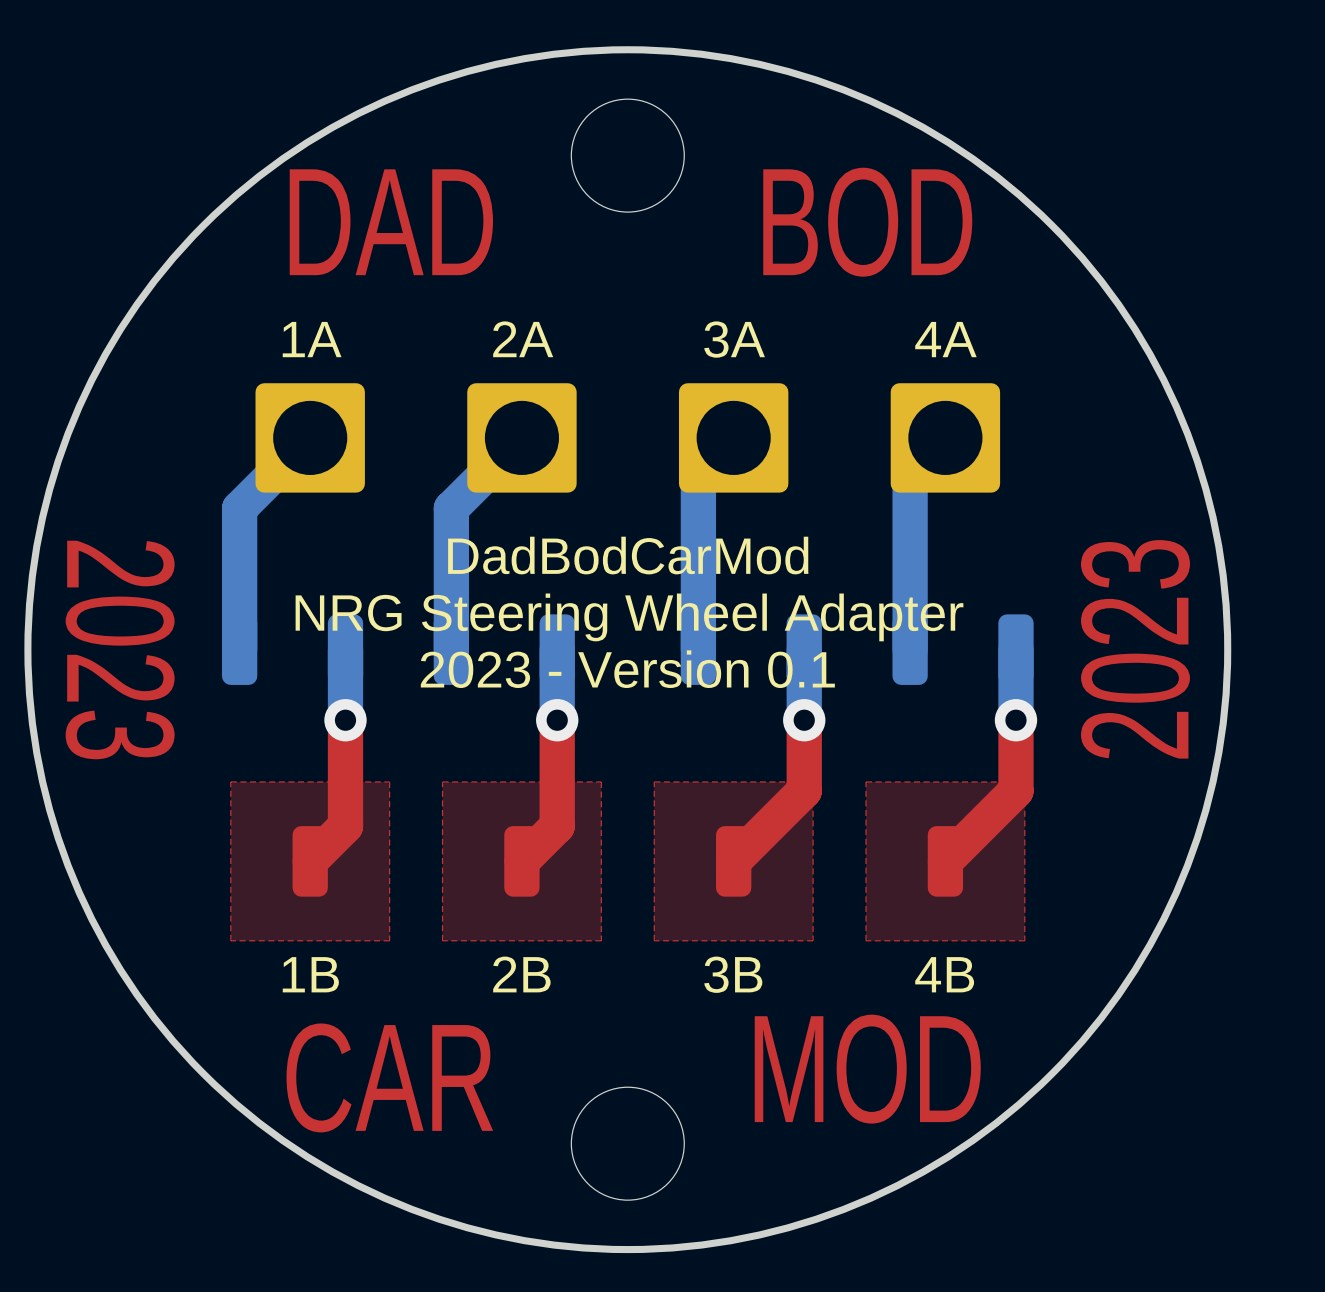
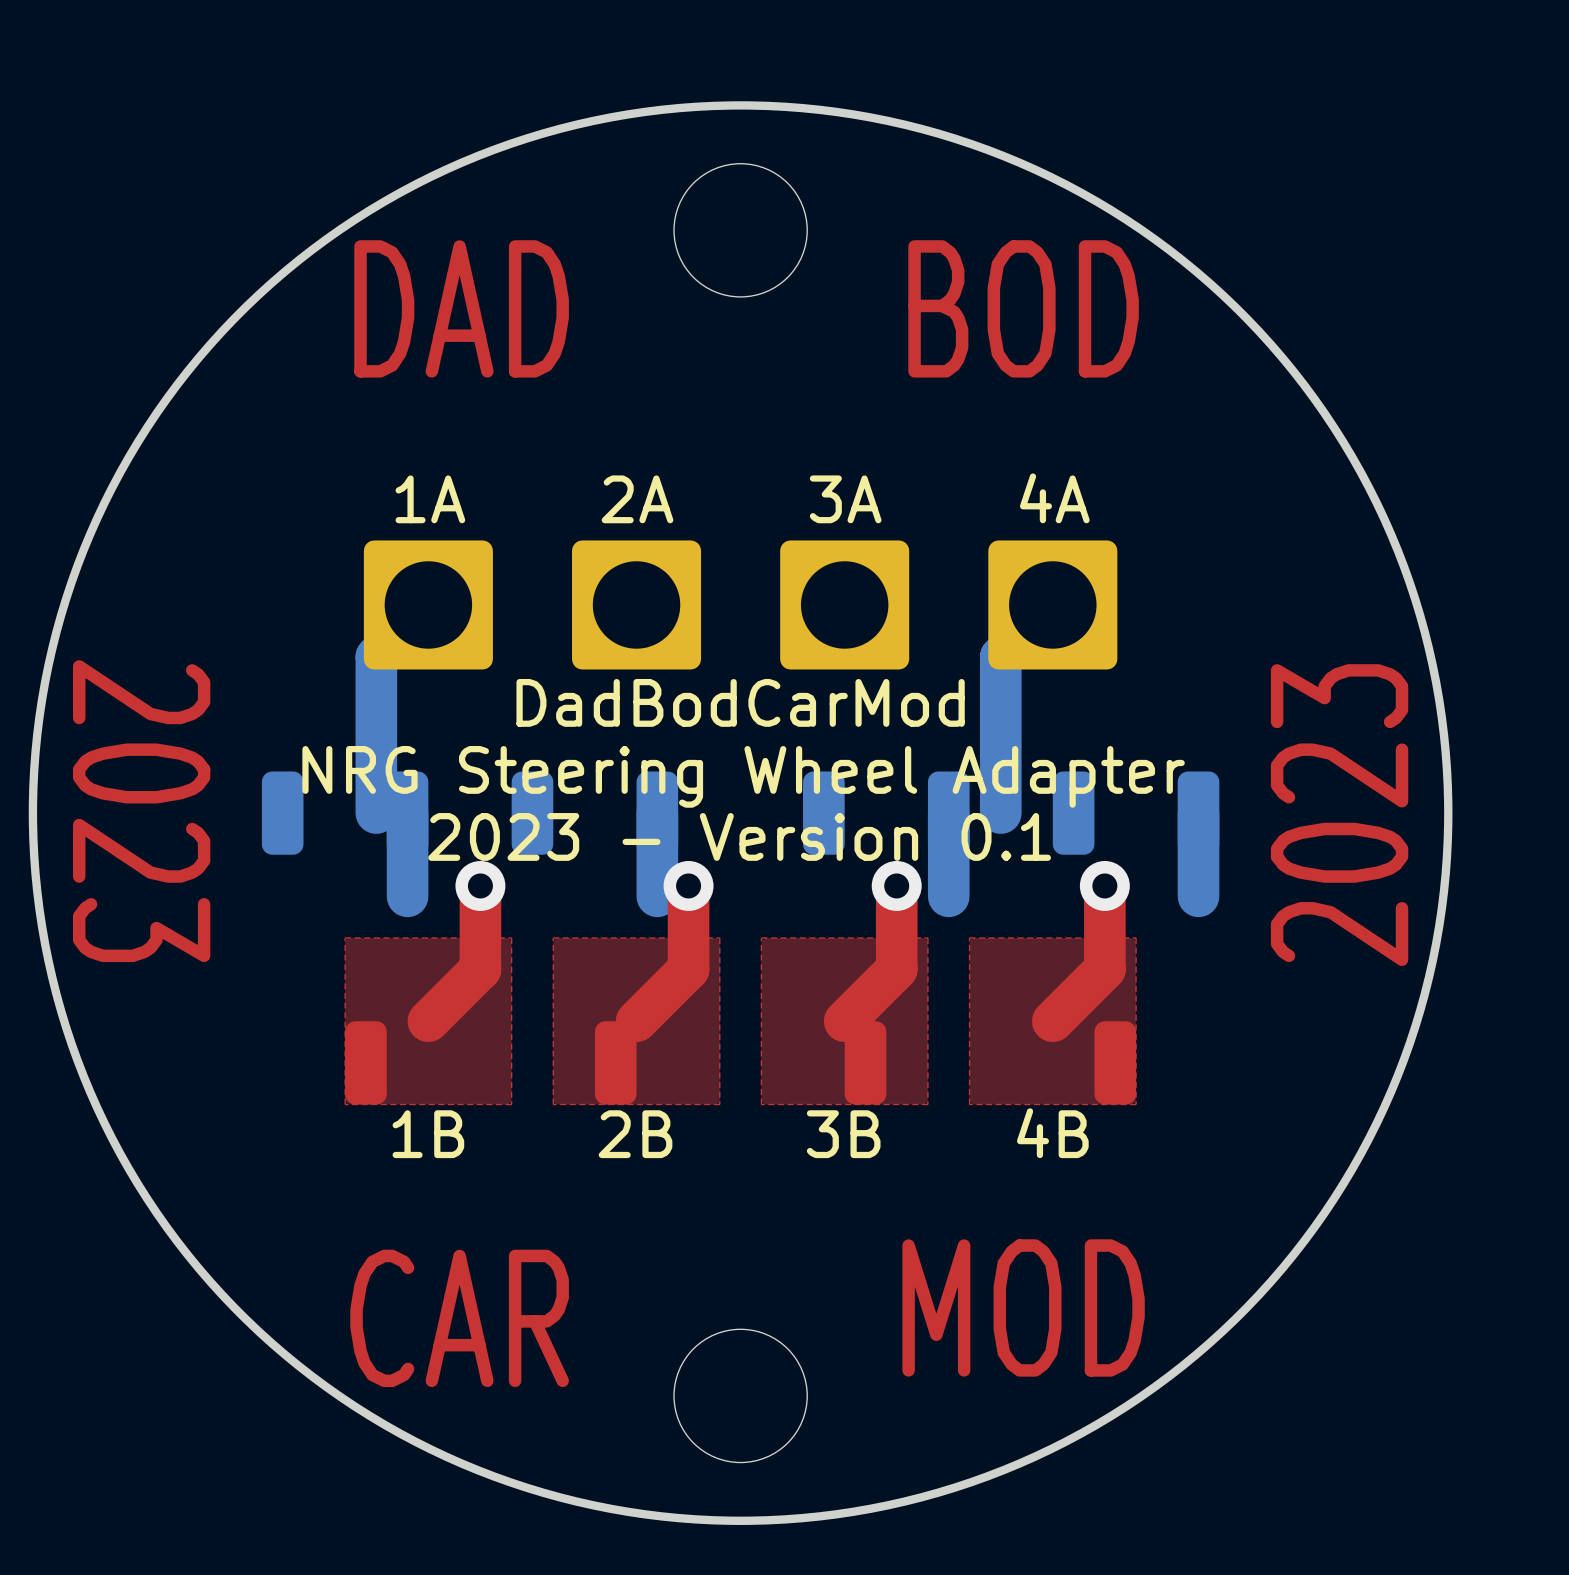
text position: 1A (312, 339) -> 1A (430, 499)
text position: 2A (523, 339) -> 2A (637, 499)
text position: 3A (734, 339) -> 3A (845, 499)
text position: 4A (945, 339) -> 4A (1054, 498)
bottom track: (310, 437) (239, 508) (239, 649) -> none
part position: (310, 437) -> (428, 604)
bottom track: (521, 437) (451, 508) (451, 649) -> none
part position: (521, 437) -> (636, 604)
part position: (733, 437) -> (844, 604)
bottom track: (945, 437) (910, 473) (910, 649) -> none
part position: (945, 437) -> (1052, 604)
bottom track: none -> (428, 604) (376, 657) (376, 813)
bottom track: (698, 473) (698, 649) -> none
bottom track: none -> (1052, 604) (1000, 657) (1000, 813)
top track: none -> (480, 885) (480, 969) (428, 1021)
top track: none -> (688, 885) (688, 969) (636, 1021)
top track: none -> (896, 885) (896, 969) (844, 1021)
top track: none -> (1104, 885) (1104, 969) (1052, 1021)
via: none -> (1104, 885)
top track: (345, 720) (345, 826) (310, 861) -> none
via position: (345, 720) -> (480, 885)
top track: (557, 720) (557, 826) (521, 861) -> none
via position: (557, 720) -> (688, 885)
top track: (804, 720) (804, 790) (733, 861) -> none
via position: (804, 720) -> (896, 885)
top track: (1015, 720) (1015, 790) (945, 861) -> none
via: (1015, 720) -> none
top zone outline: none -> (345, 938) (345, 1104) (511, 1104) (511, 938) (345, 938)
top zone outline: none -> (969, 938) (1136, 938) (1136, 1104) (969, 1104) (969, 938)
top zone outline: (230, 781) (230, 940) (389, 940) (389, 781) (230, 781) -> none
top zone outline: (442, 781) (601, 781) (601, 940) (442, 940) (442, 781) -> (553, 938) (553, 1104) (719, 1104) (719, 938) (553, 938)
top zone outline: (654, 781) (813, 781) (813, 940) (654, 940) (654, 781) -> (761, 938) (761, 1104) (927, 1104) (927, 938) (761, 938)
top zone outline: (866, 781) (1024, 781) (1024, 940) (866, 940) (866, 781) -> none
text position: 1B (310, 974) -> 1B (428, 1134)
text position: 2B (521, 974) -> 2B (635, 1134)
text position: 3B (733, 974) -> 3B (843, 1134)
text position: 4B (944, 974) -> 4B (1052, 1133)

